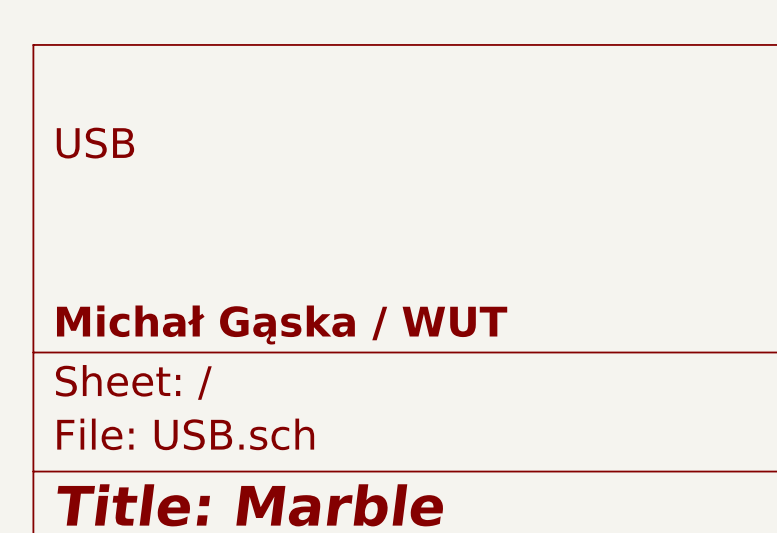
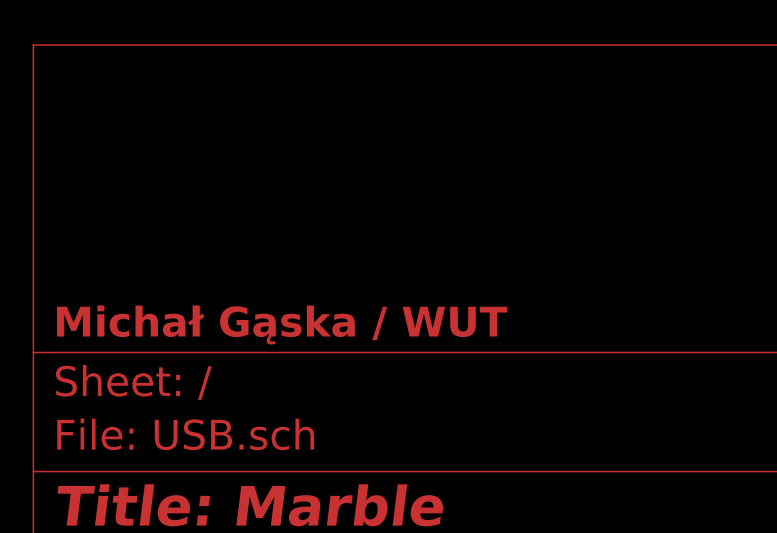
title block: USB (95, 143) -> none

